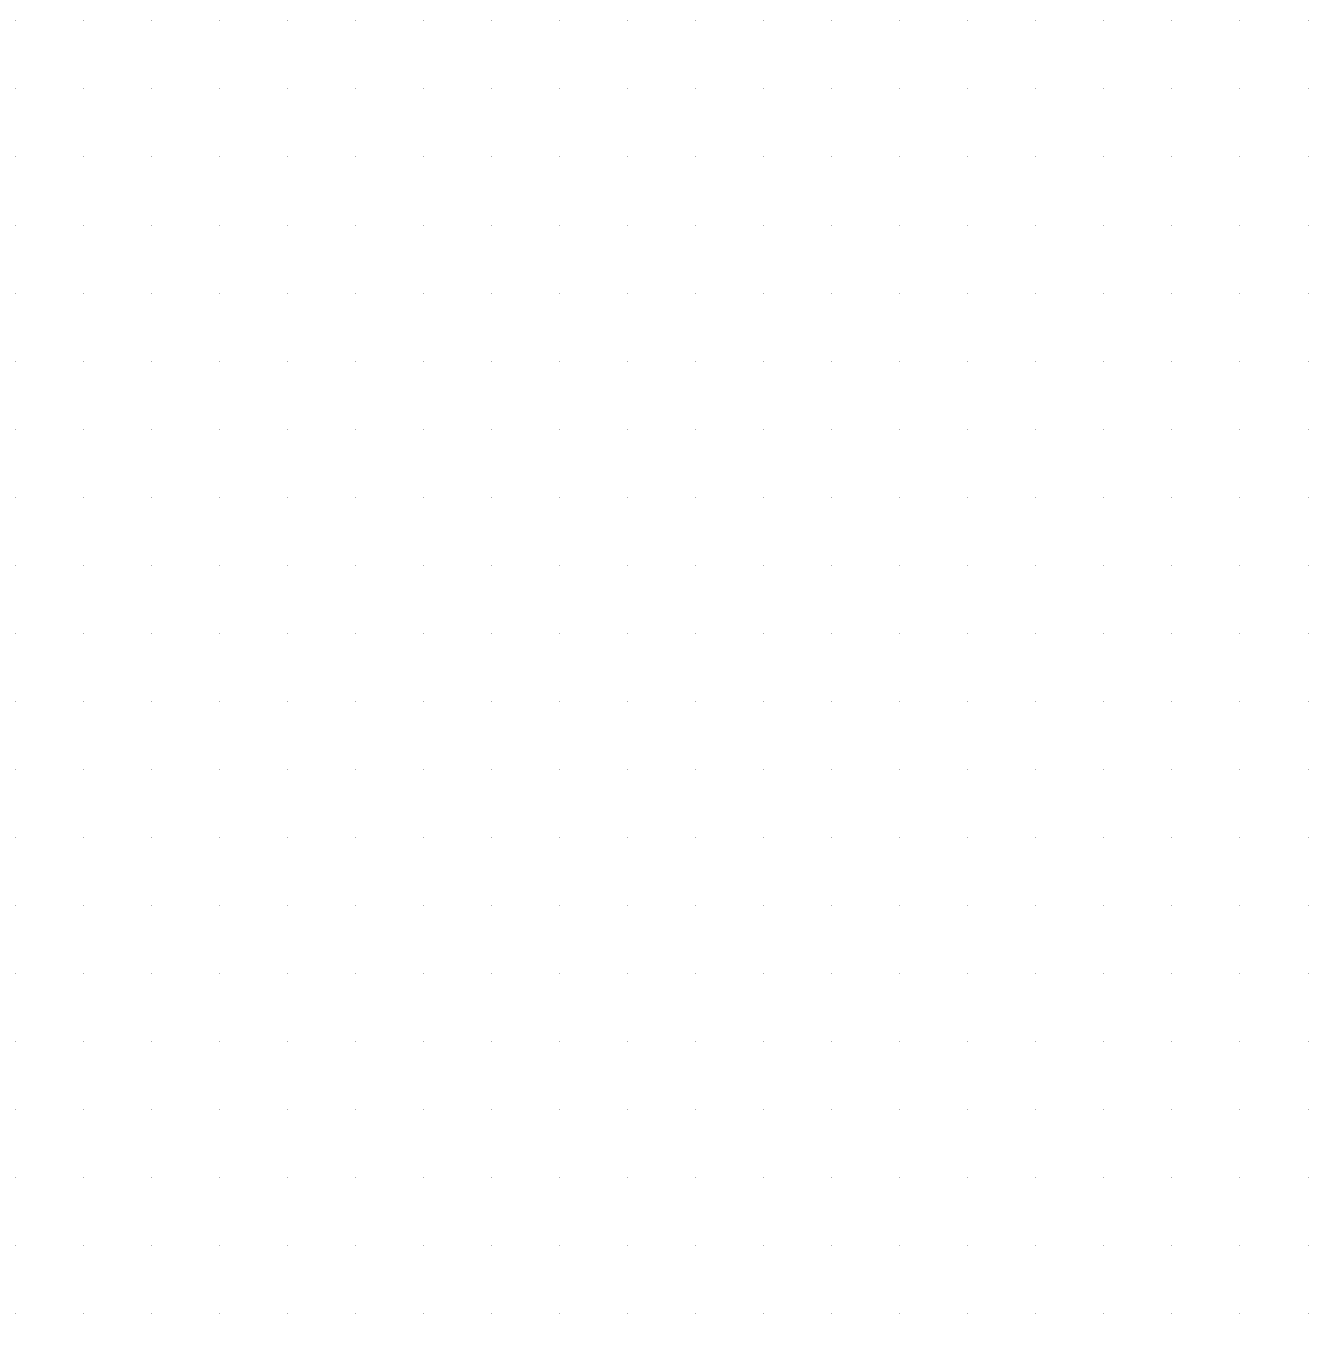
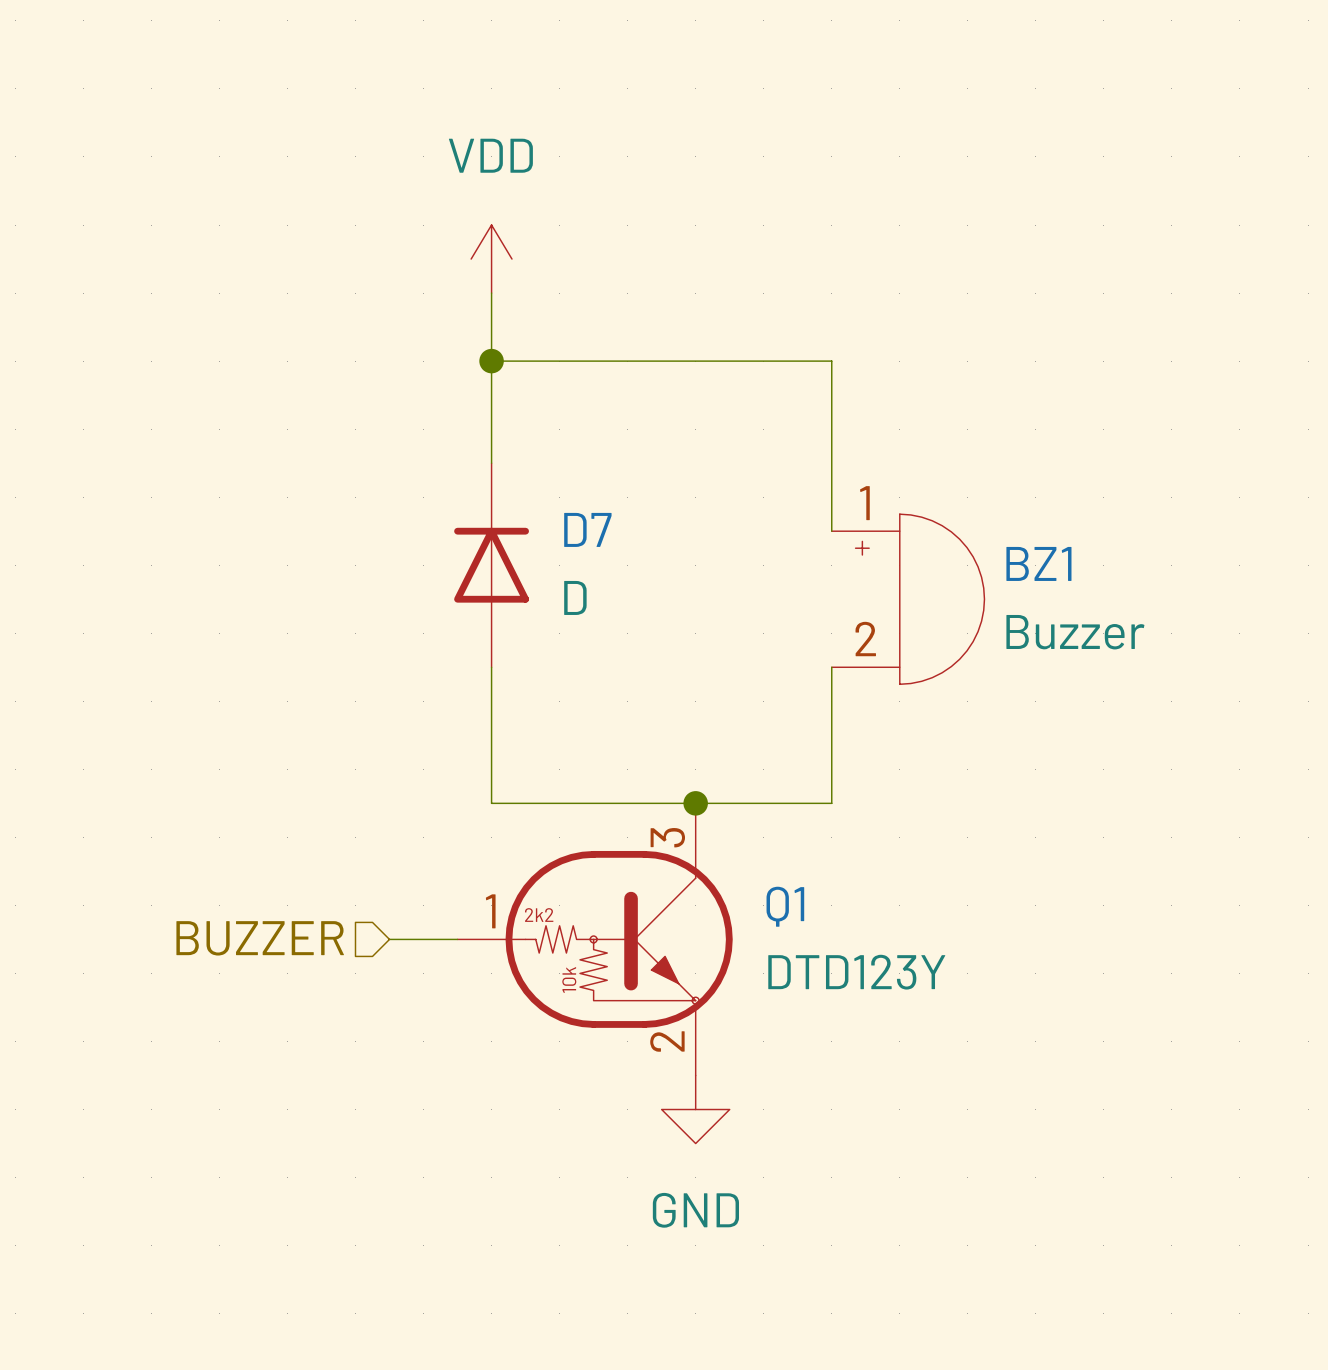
power symbol: none -> VDD (491, 259)
wire: none -> (491, 293) (491, 463)
wire: none -> (491, 361) (831, 361) (831, 531)
junction: none -> (491, 361)
D7: none -> D (491, 565)
BZ1: none -> Buzzer (908, 599)
wire: none -> (491, 667) (491, 803) (831, 803) (831, 667)
junction: none -> (695, 803)
hierarchical label: none -> BUZZER (260, 938)
wire: none -> (389, 939) (457, 939)
Q1: none -> DTD123Y (595, 939)
power symbol: none -> GND (695, 1109)

